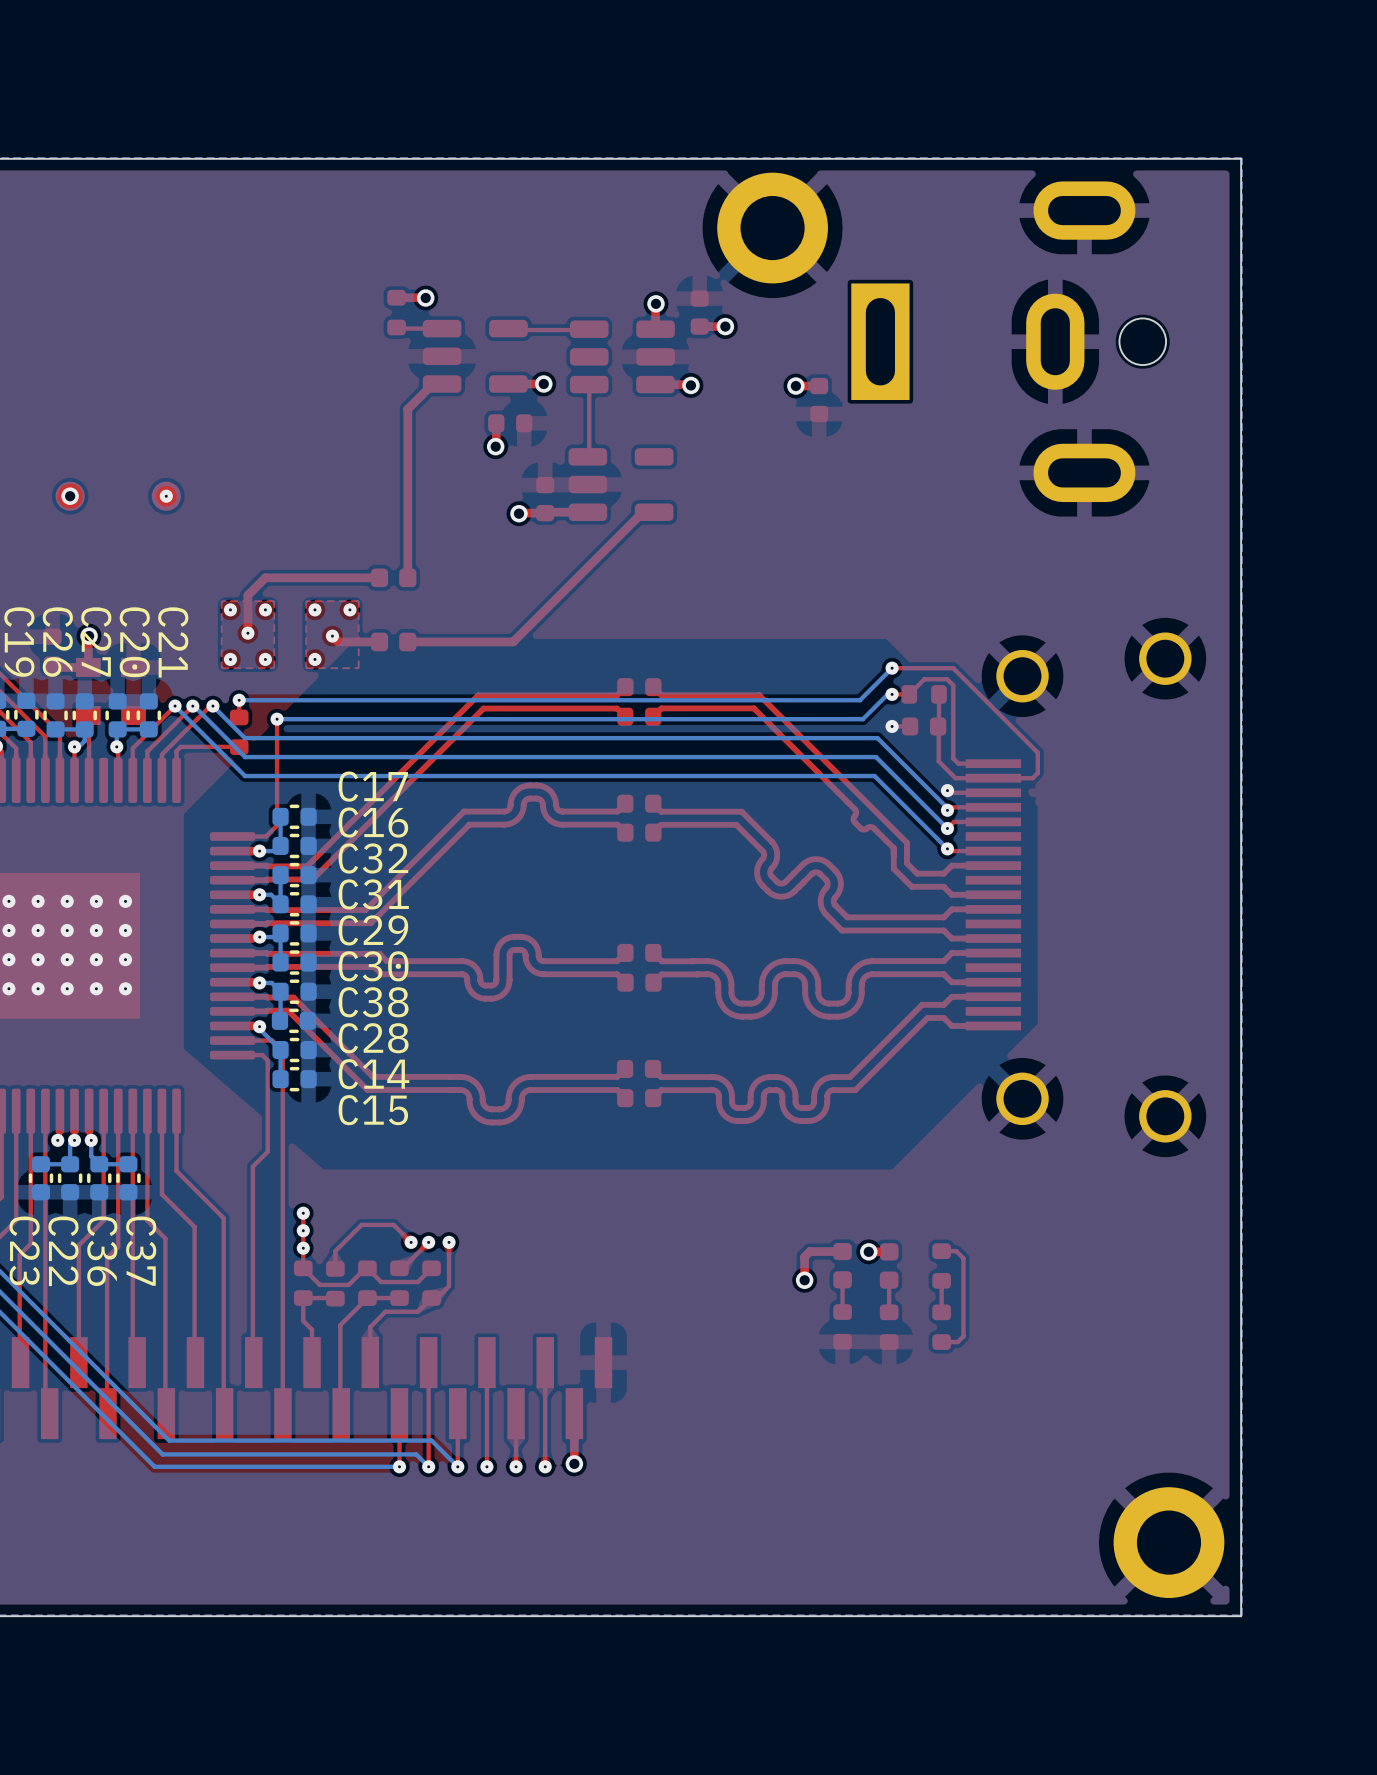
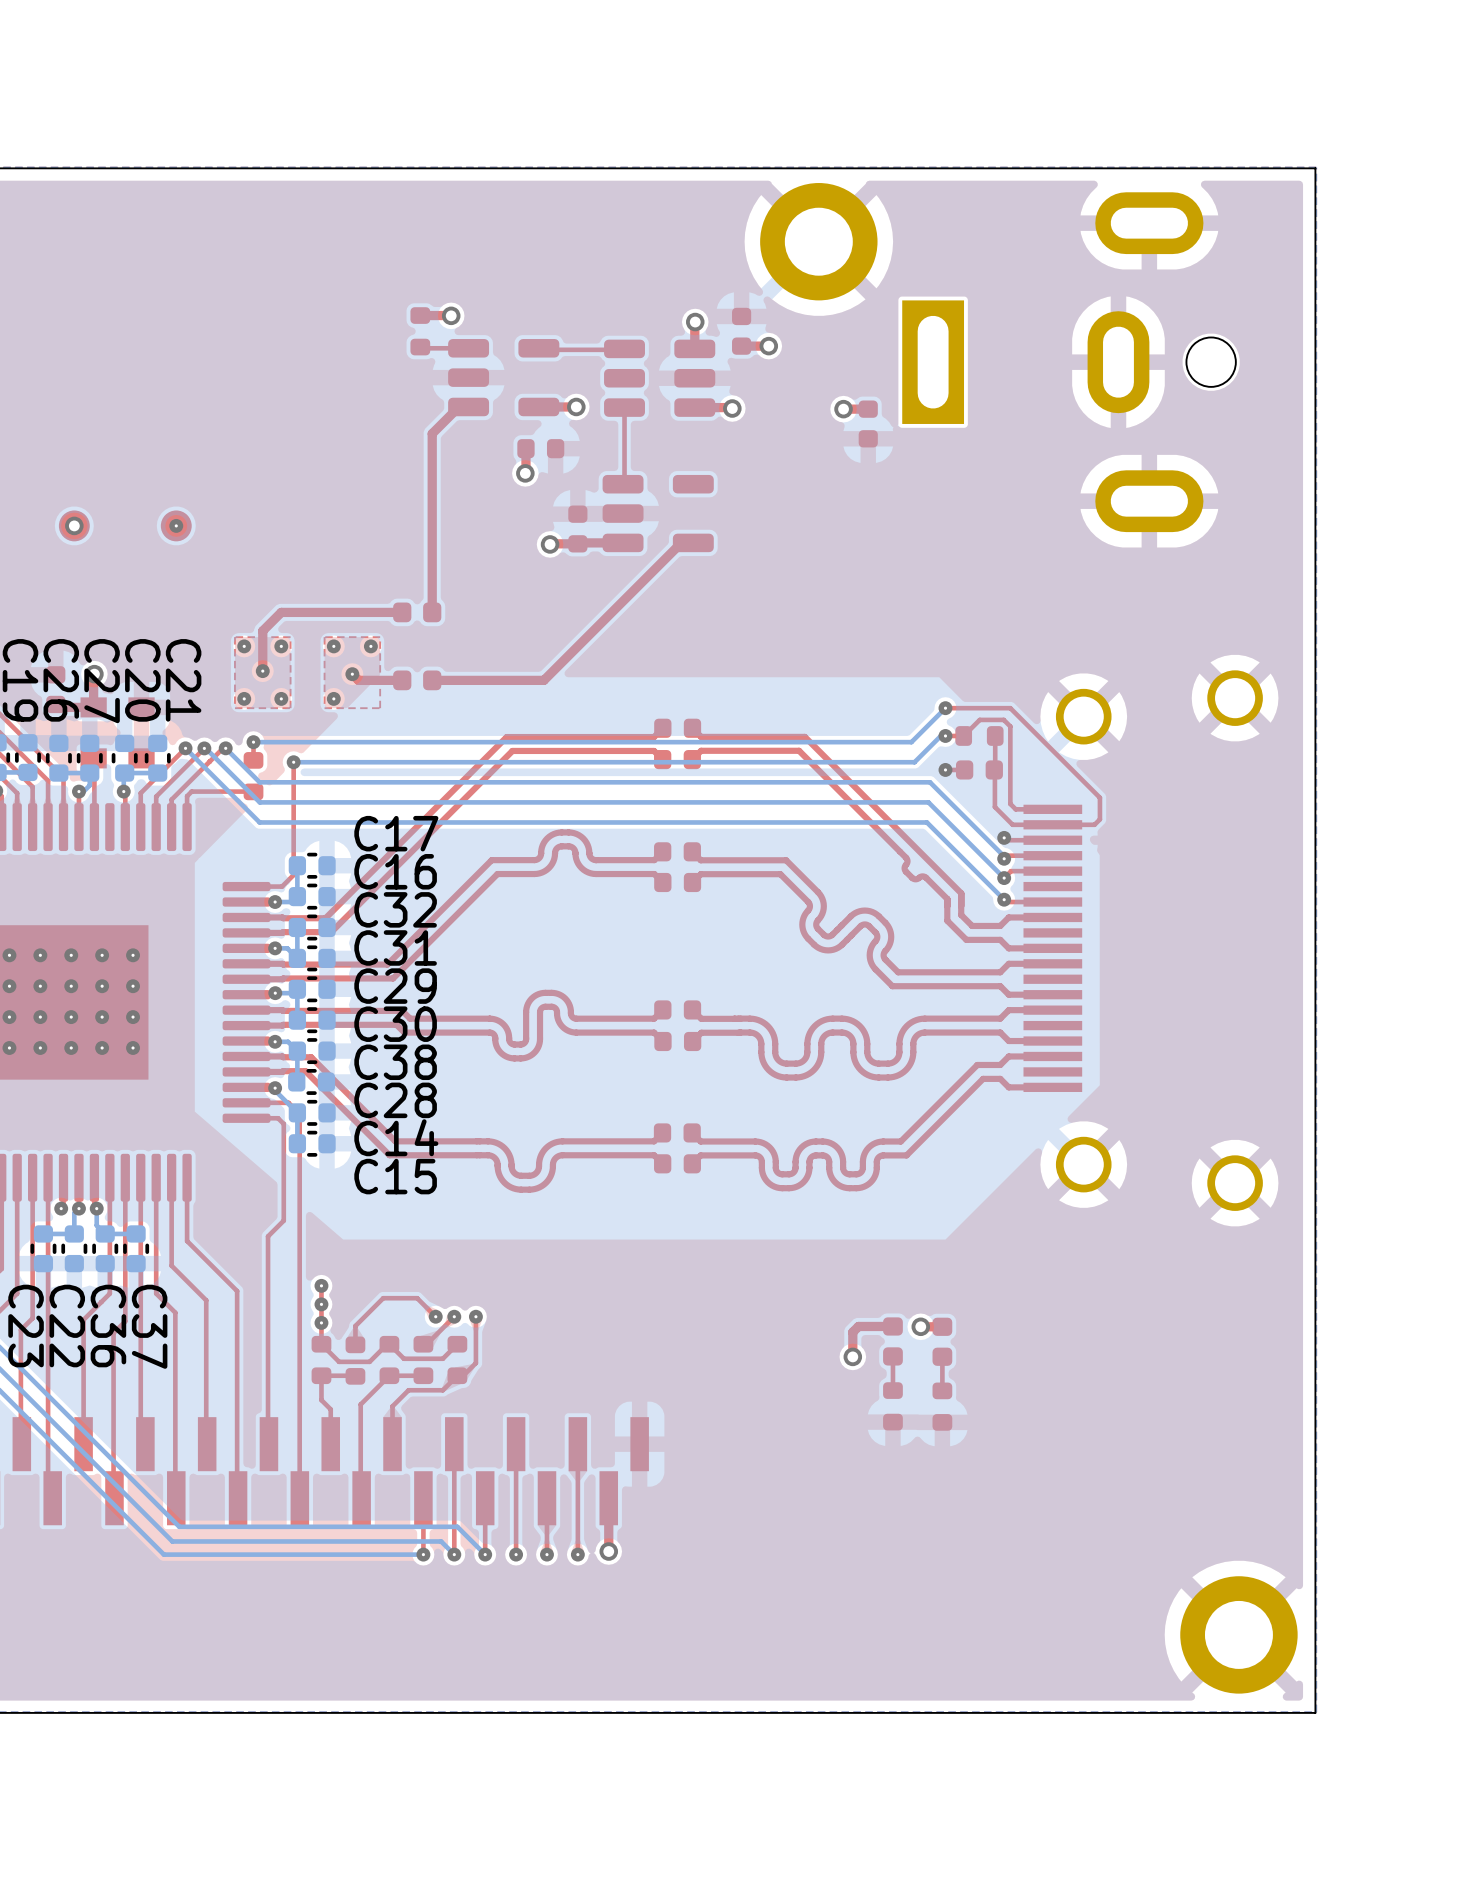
top track: (941, 1251) (956, 1251) (963, 1258) (963, 1336) (957, 1342) (941, 1342) -> none
part: (941, 1265) -> none
top track: (941, 1280) (941, 1312) -> none
part: (941, 1327) -> none

